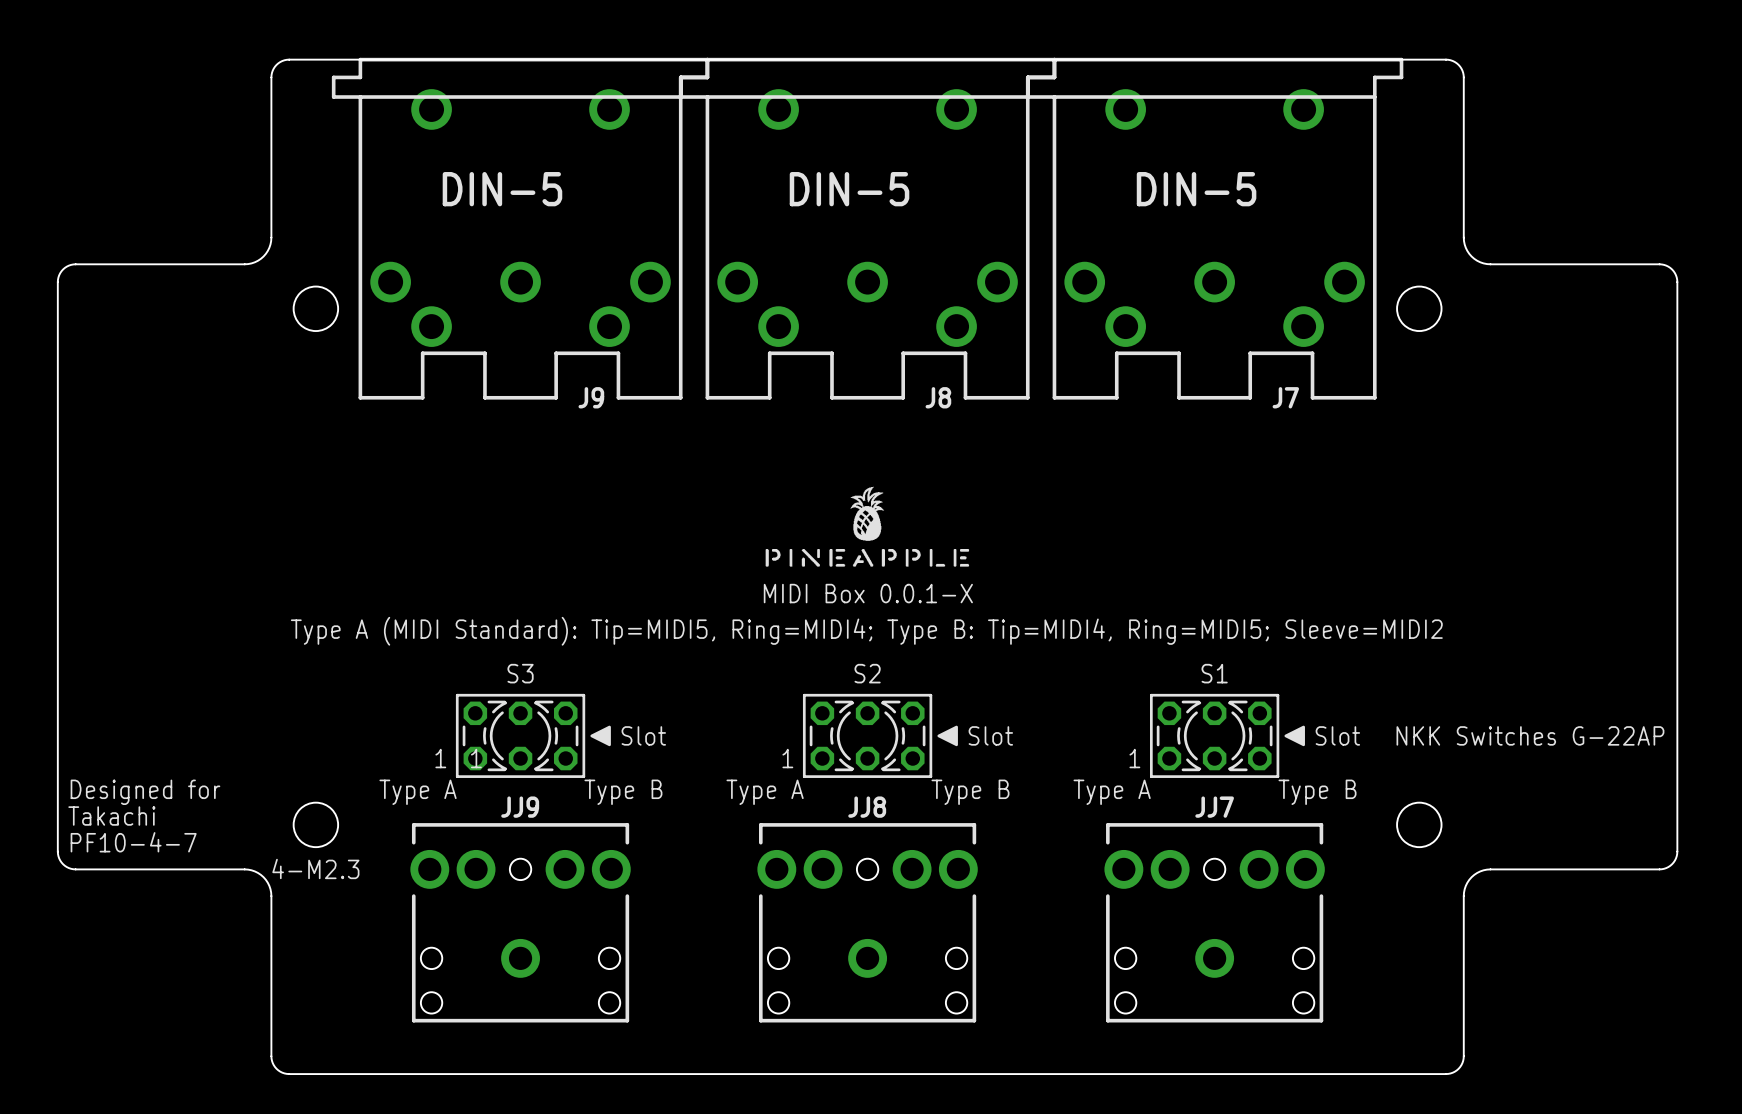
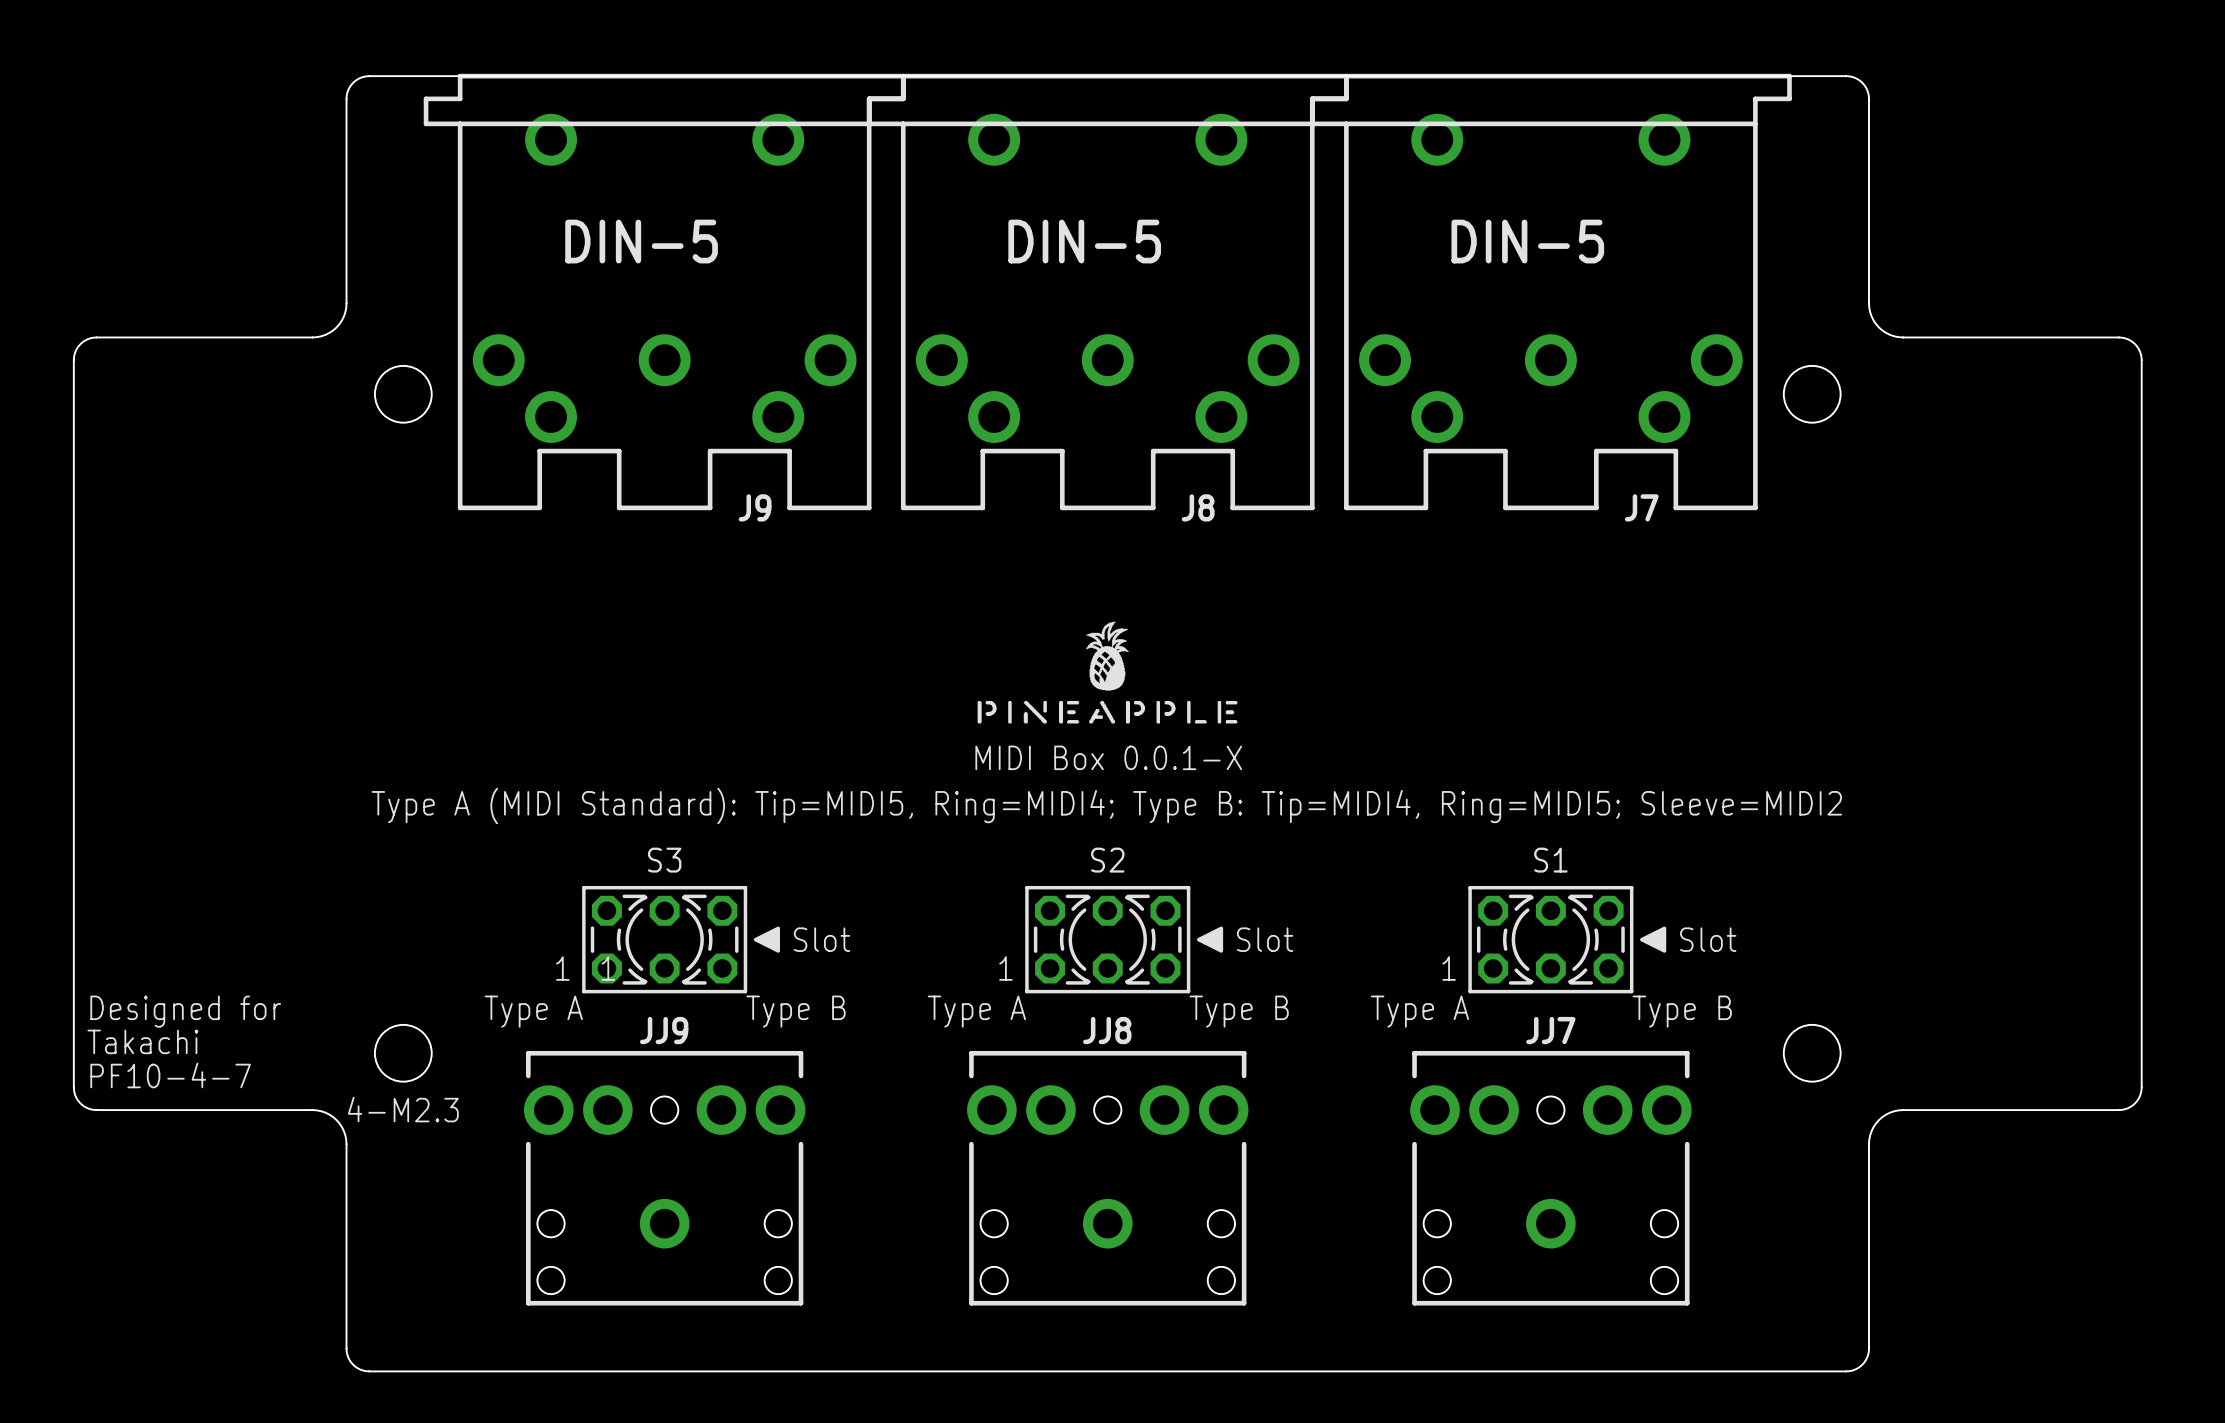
text: NKK Switches G-22AP (1530, 735) -> none

